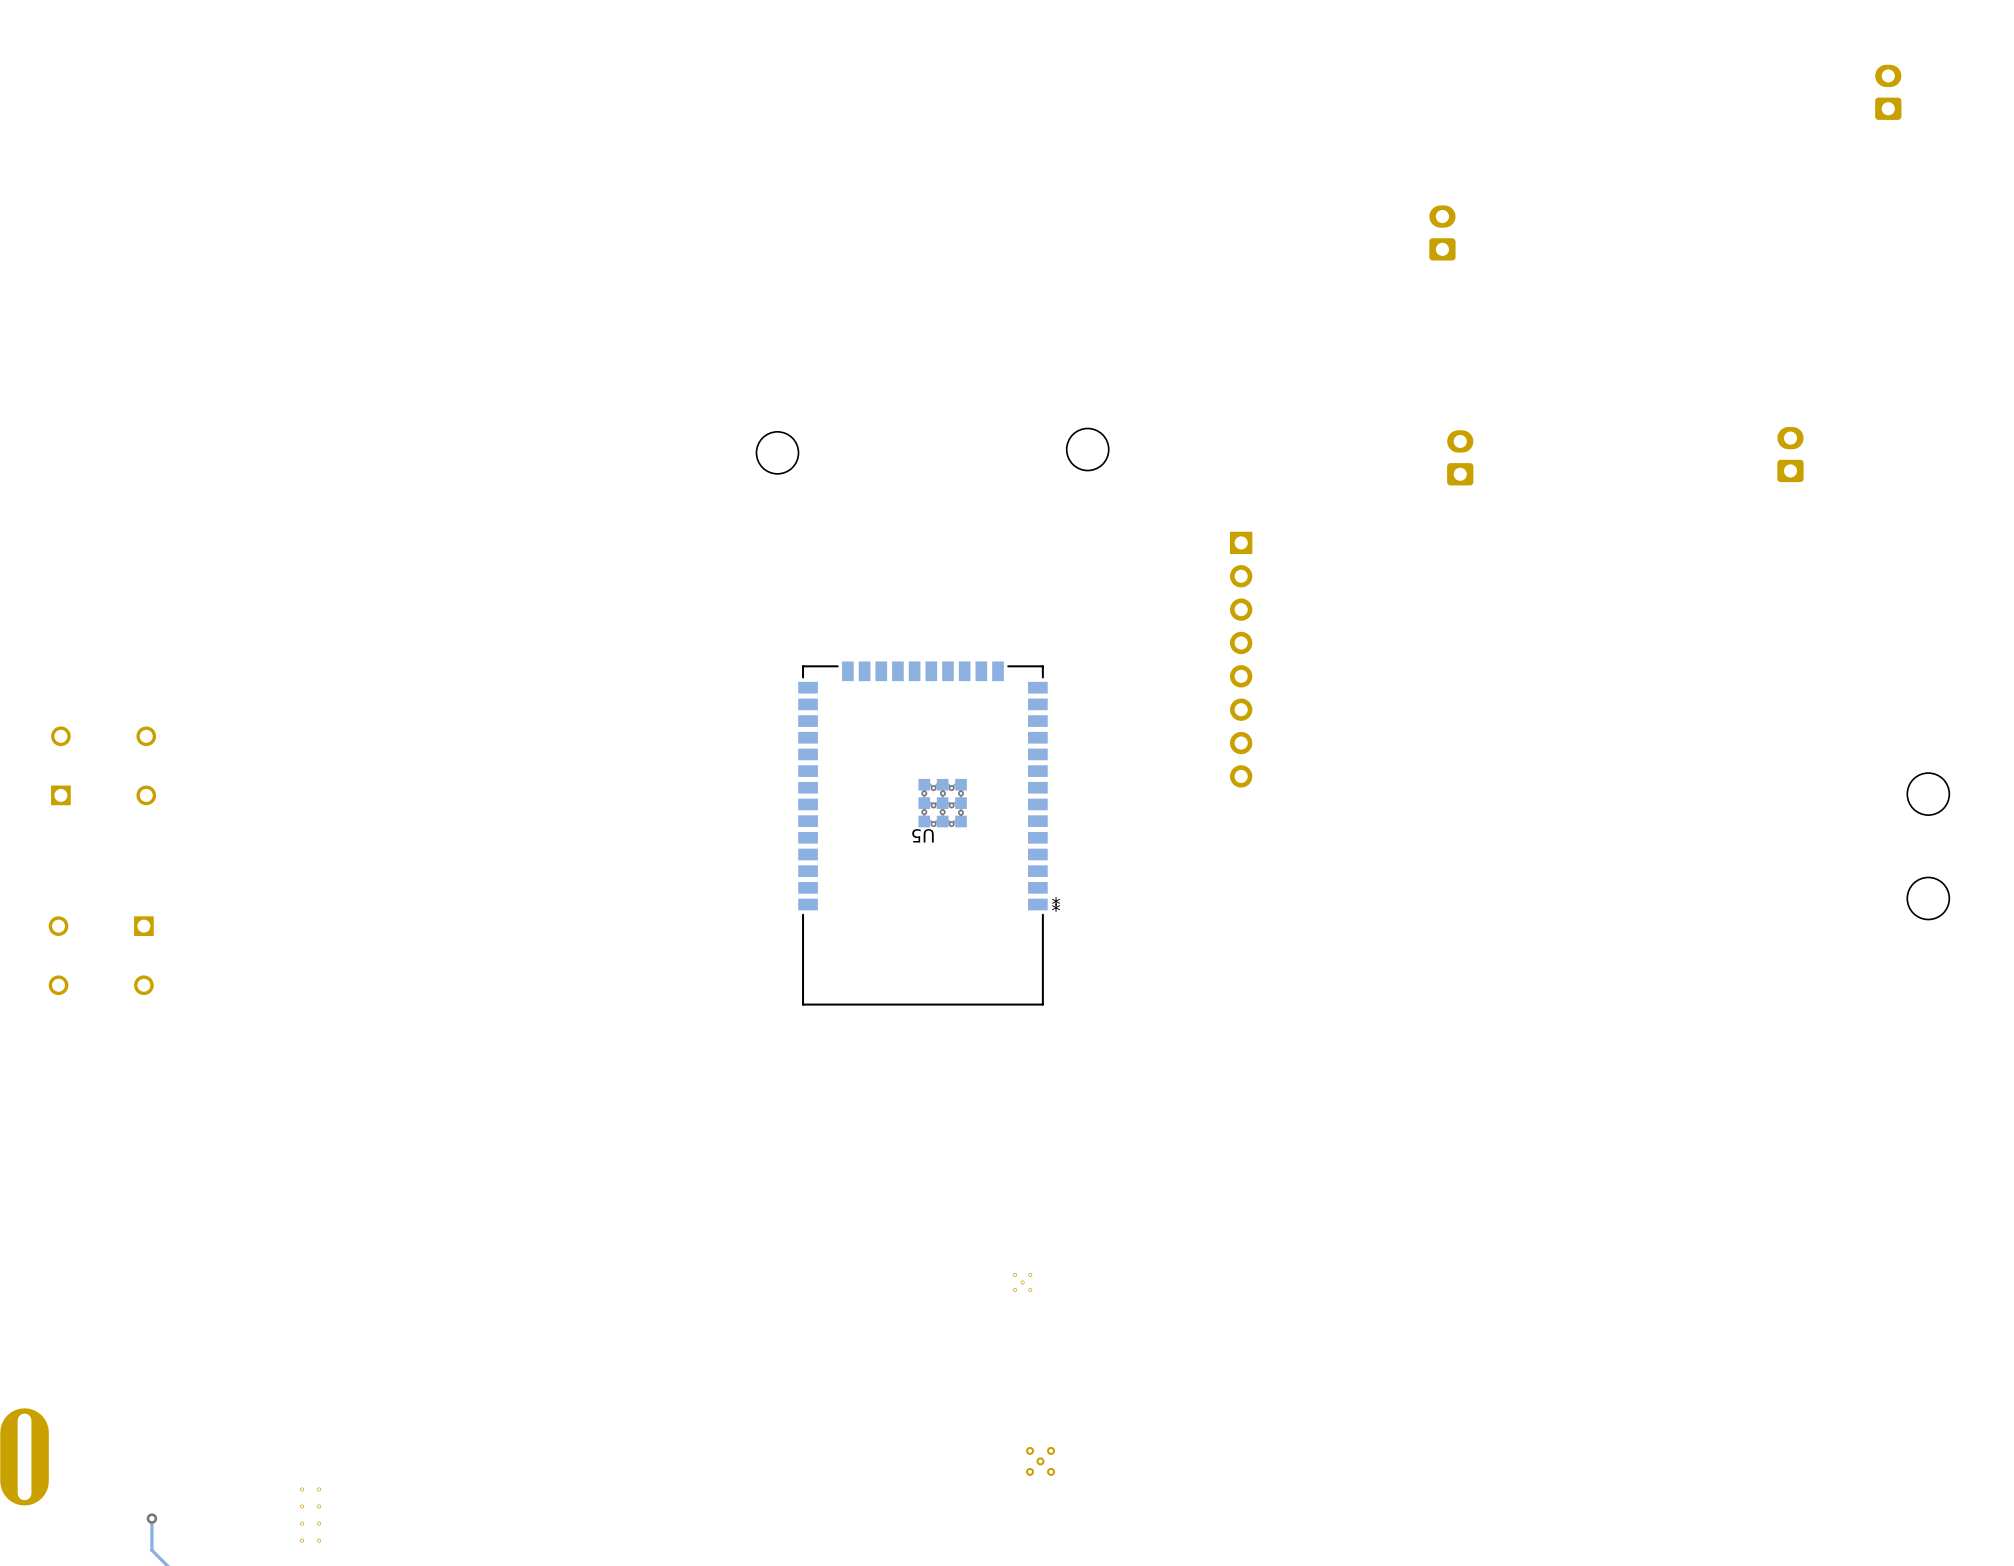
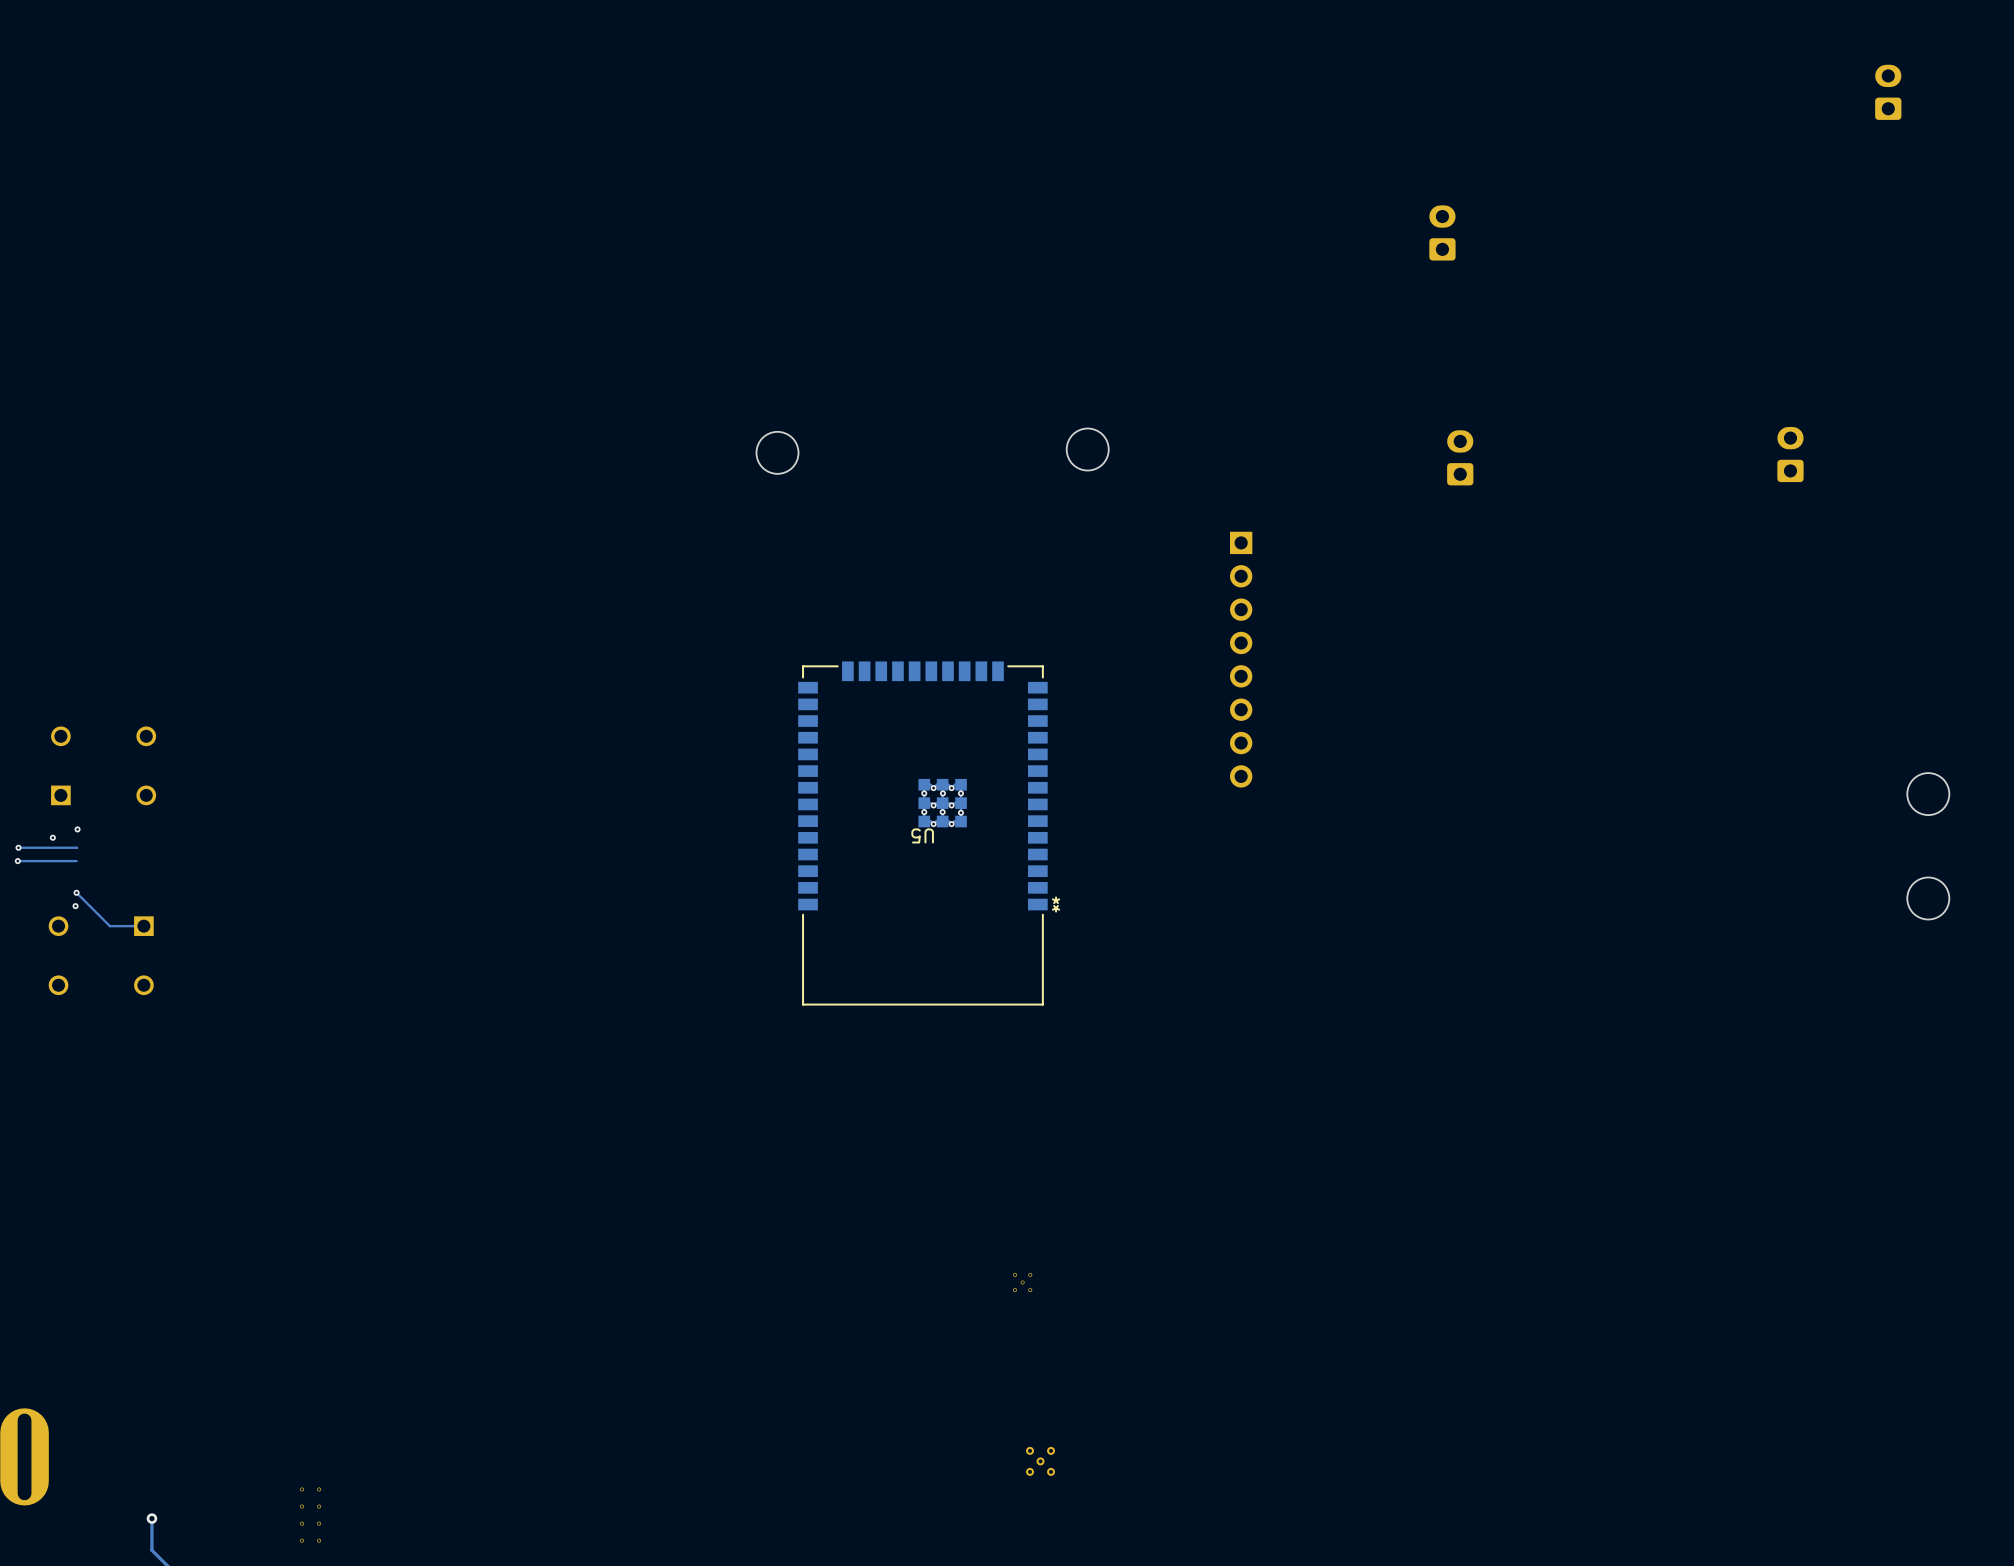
via: none -> (77, 829)
via: none -> (52, 837)
via: none -> (18, 847)
track: none -> (76, 847) (18, 847)
via: none -> (17, 861)
track: none -> (76, 861) (17, 861)
track: none -> (76, 892) (109, 926) (143, 926)
via: none -> (76, 892)
via: none -> (75, 906)

